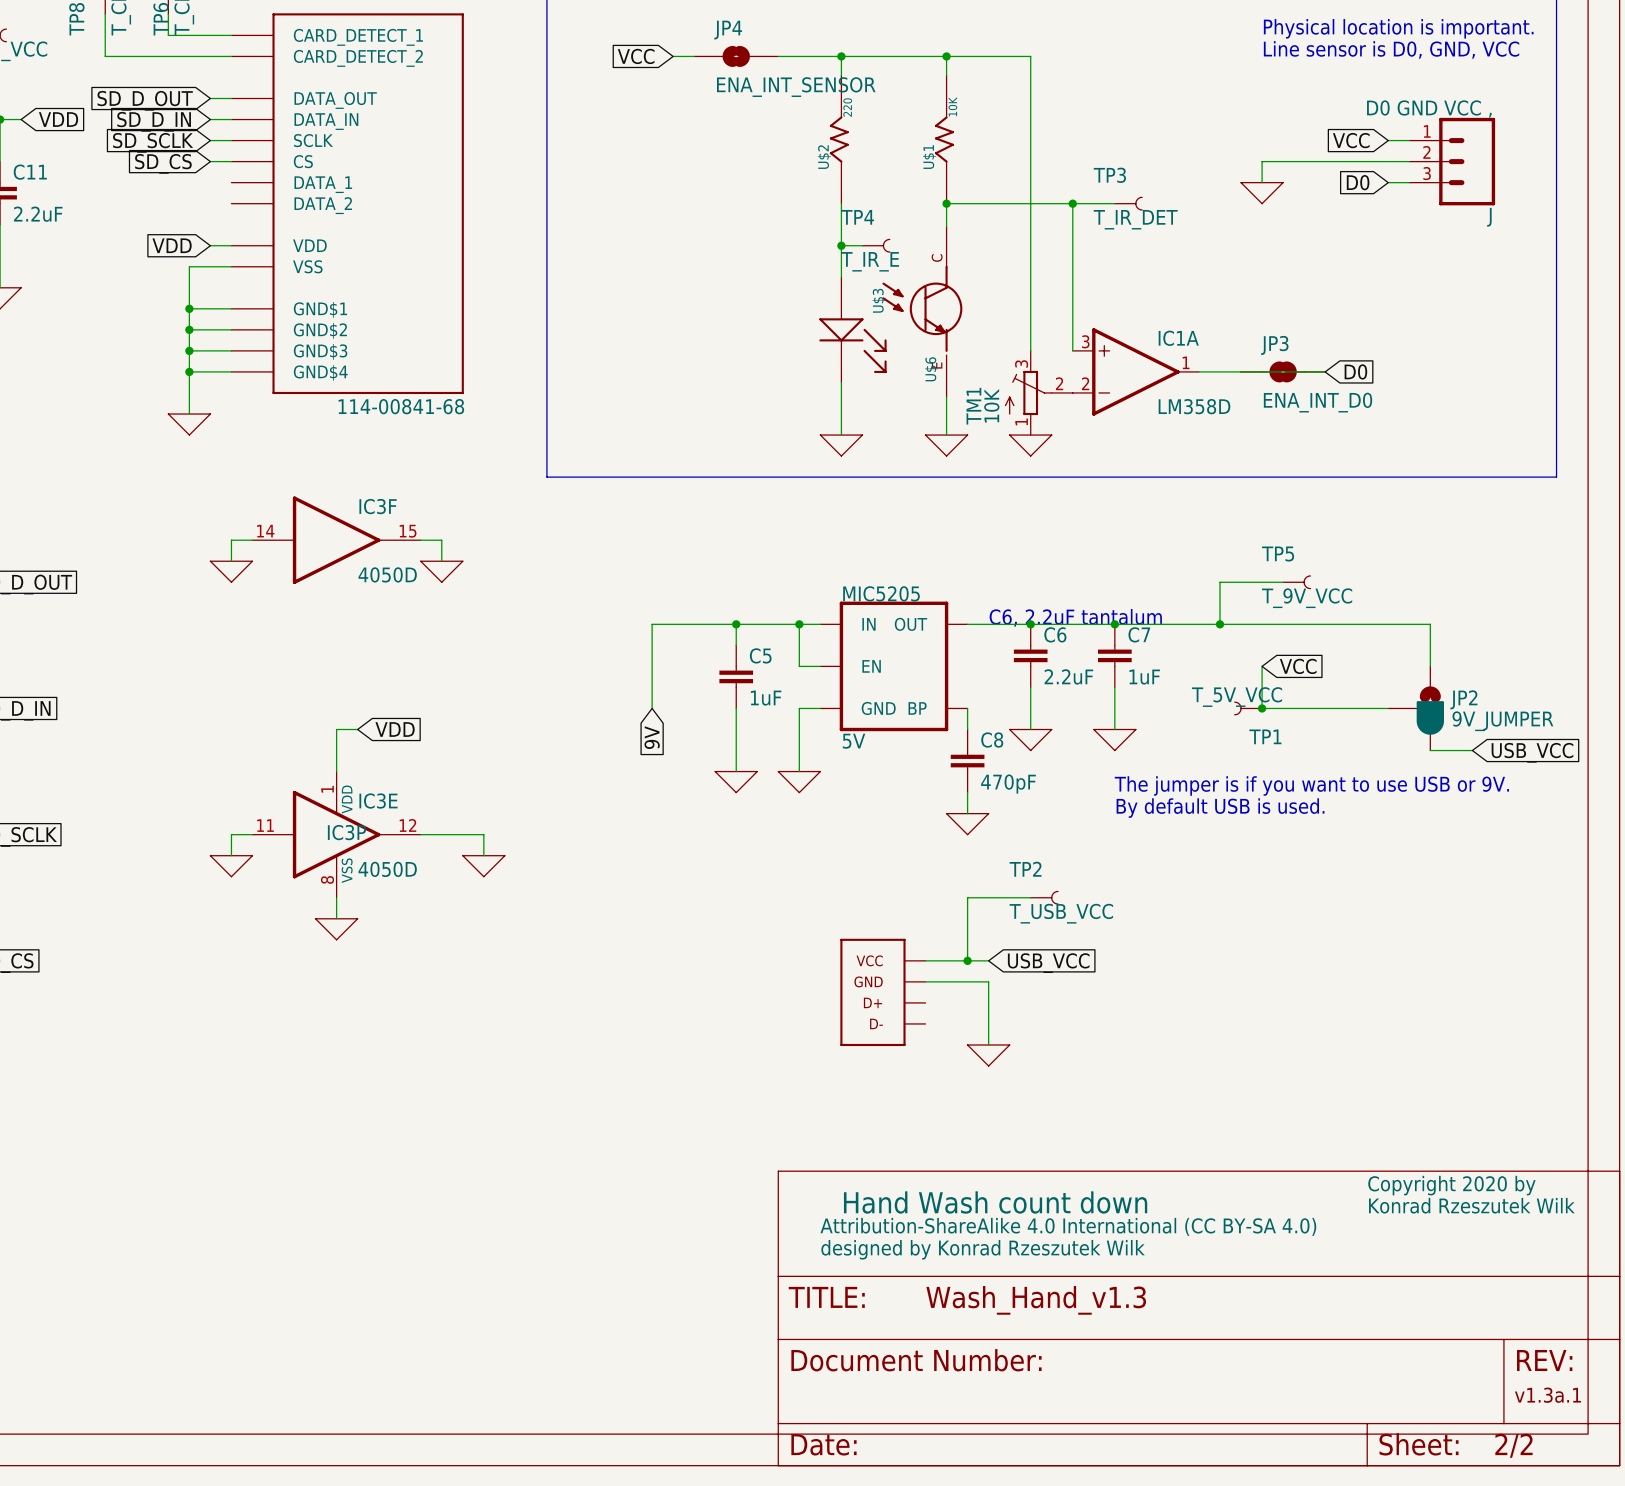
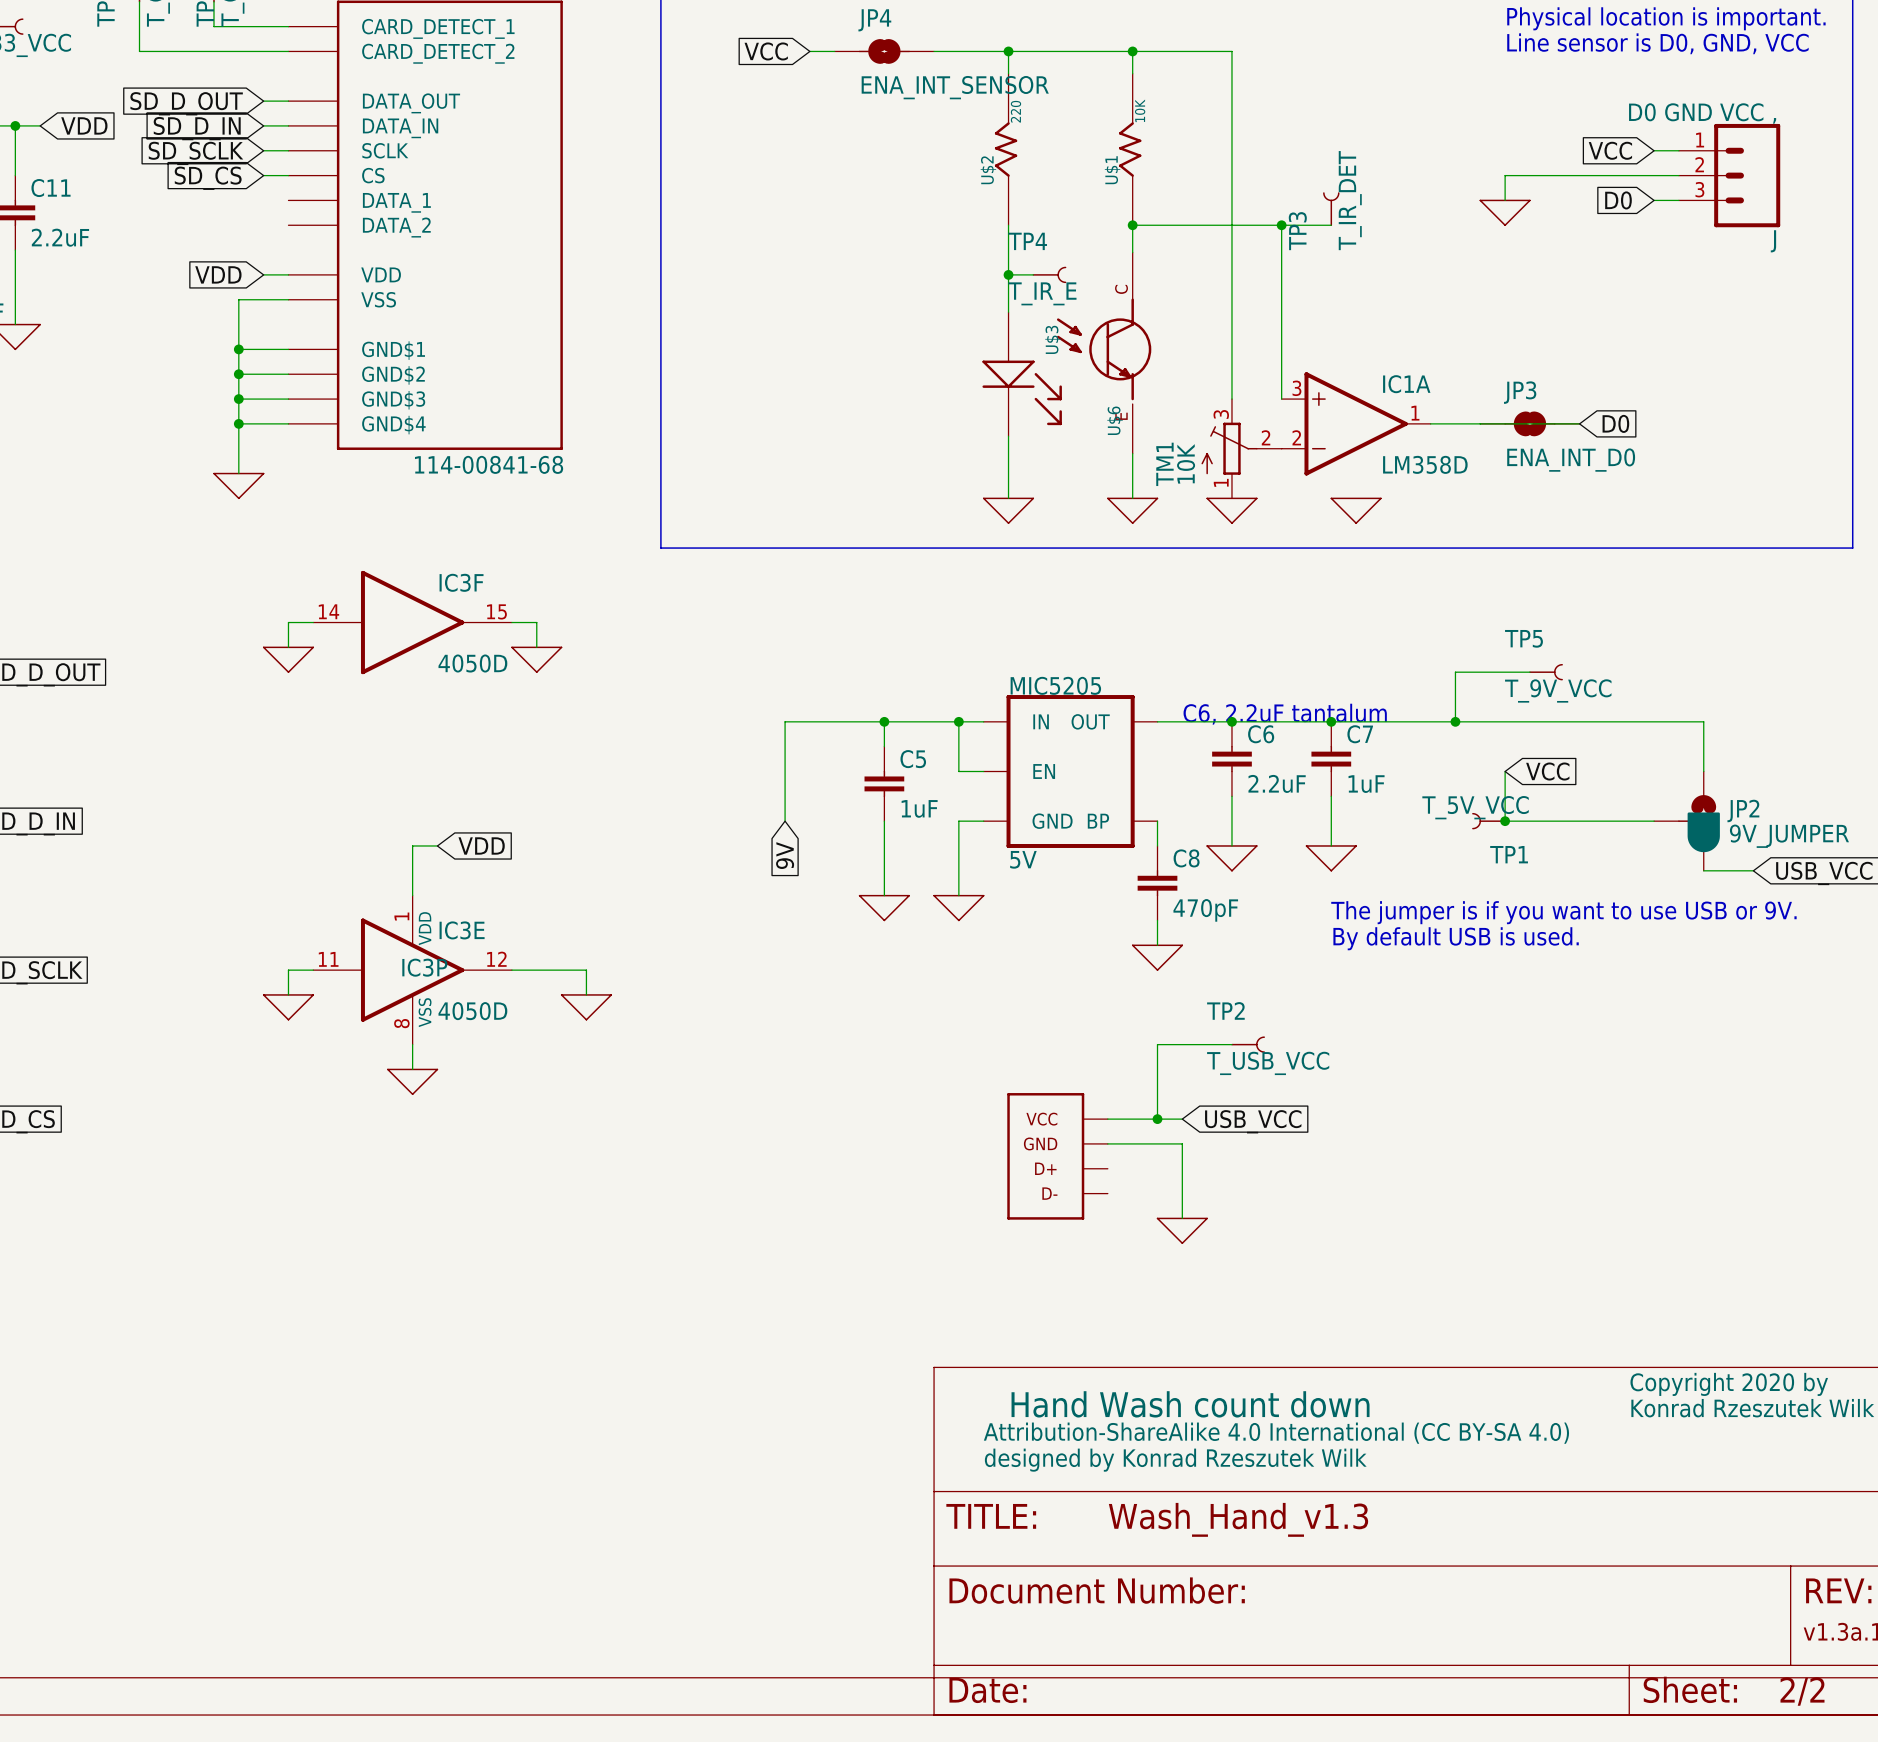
TP3 rotation: 0° (1128, 203) -> 90° counterclockwise (1331, 209)
TP3 position: (1128, 203) -> (1331, 209)
power symbol: none -> (1356, 510)

